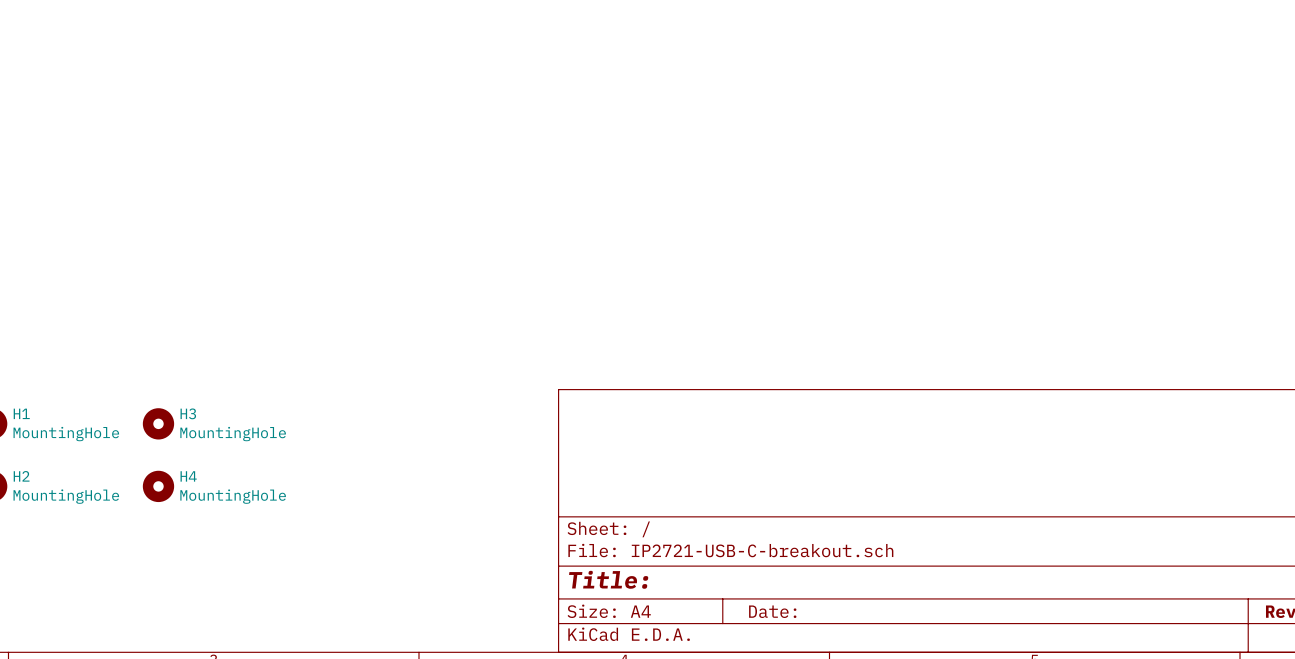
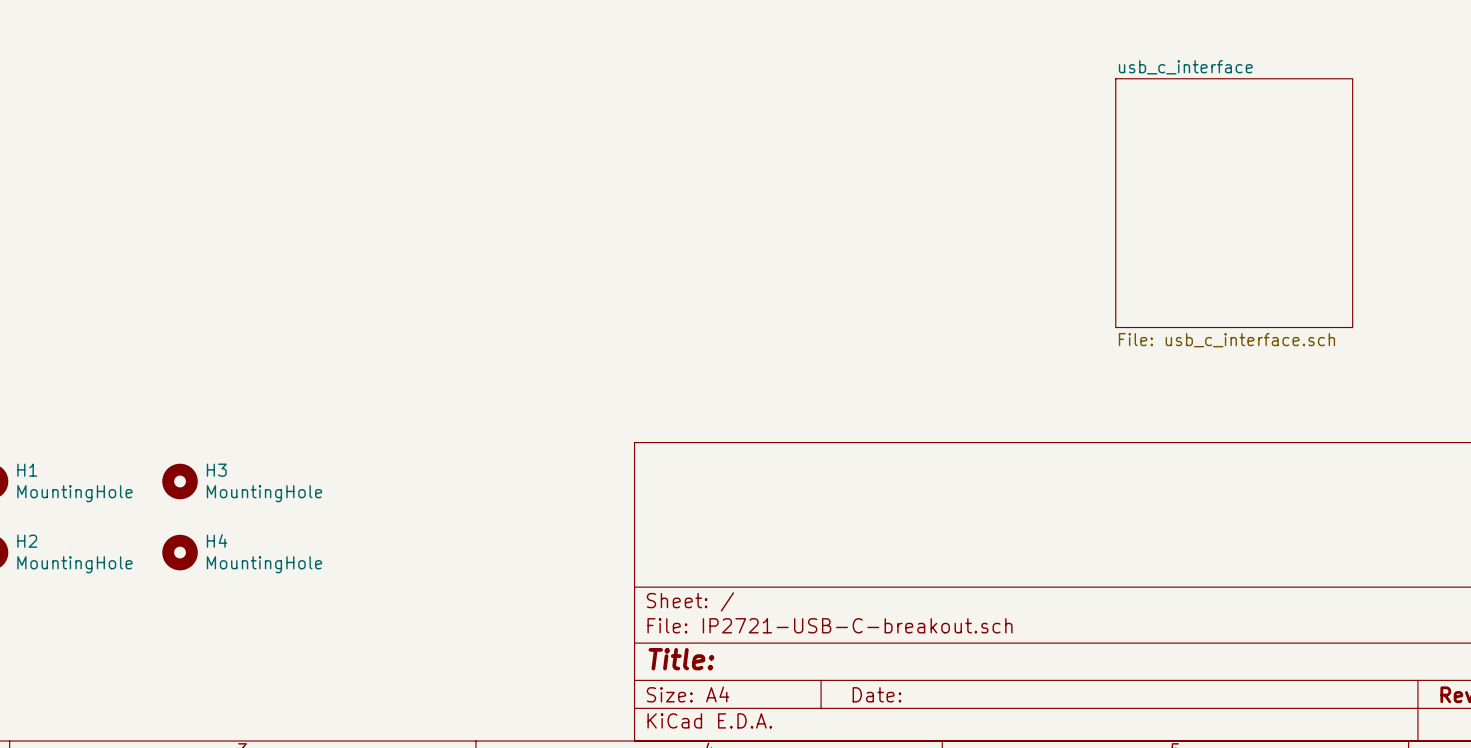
sheet usb_c_interface: none -> File: usb_c_interface.sch (1234, 203)

